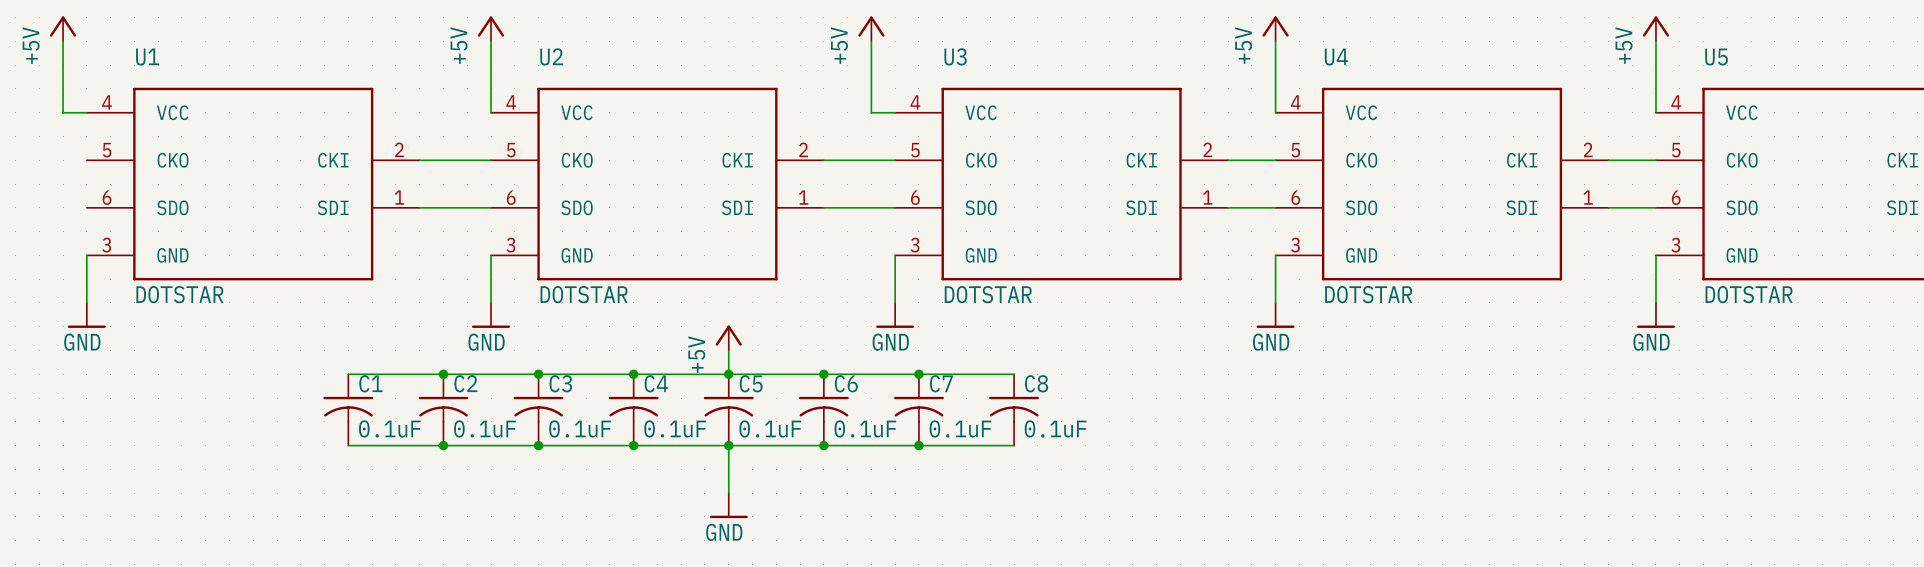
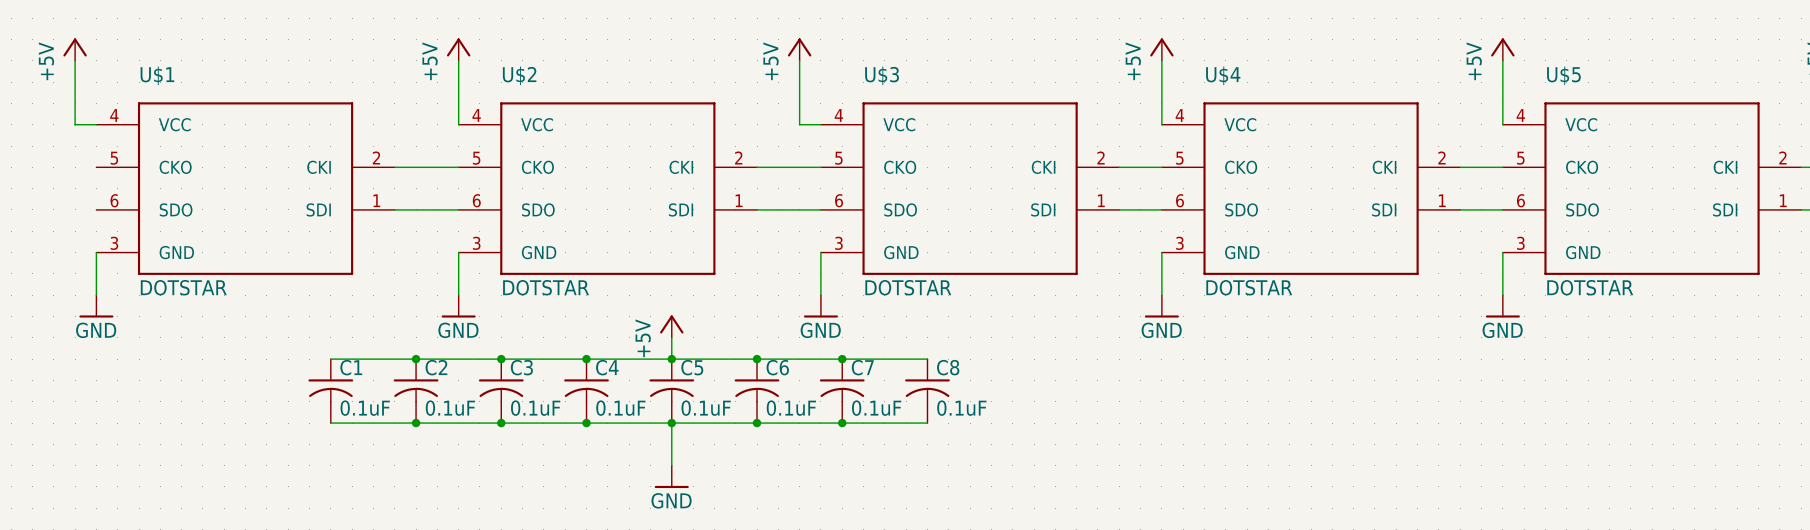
U2 name: U2 (551, 56) -> U$2 (519, 75)
U3 name: U3 (955, 56) -> U$3 (882, 75)
U1 name: U1 (147, 57) -> U$1 (157, 75)
U4 name: U4 (1336, 57) -> U$4 (1223, 75)
U5 name: U5 (1716, 57) -> U$5 (1563, 75)

